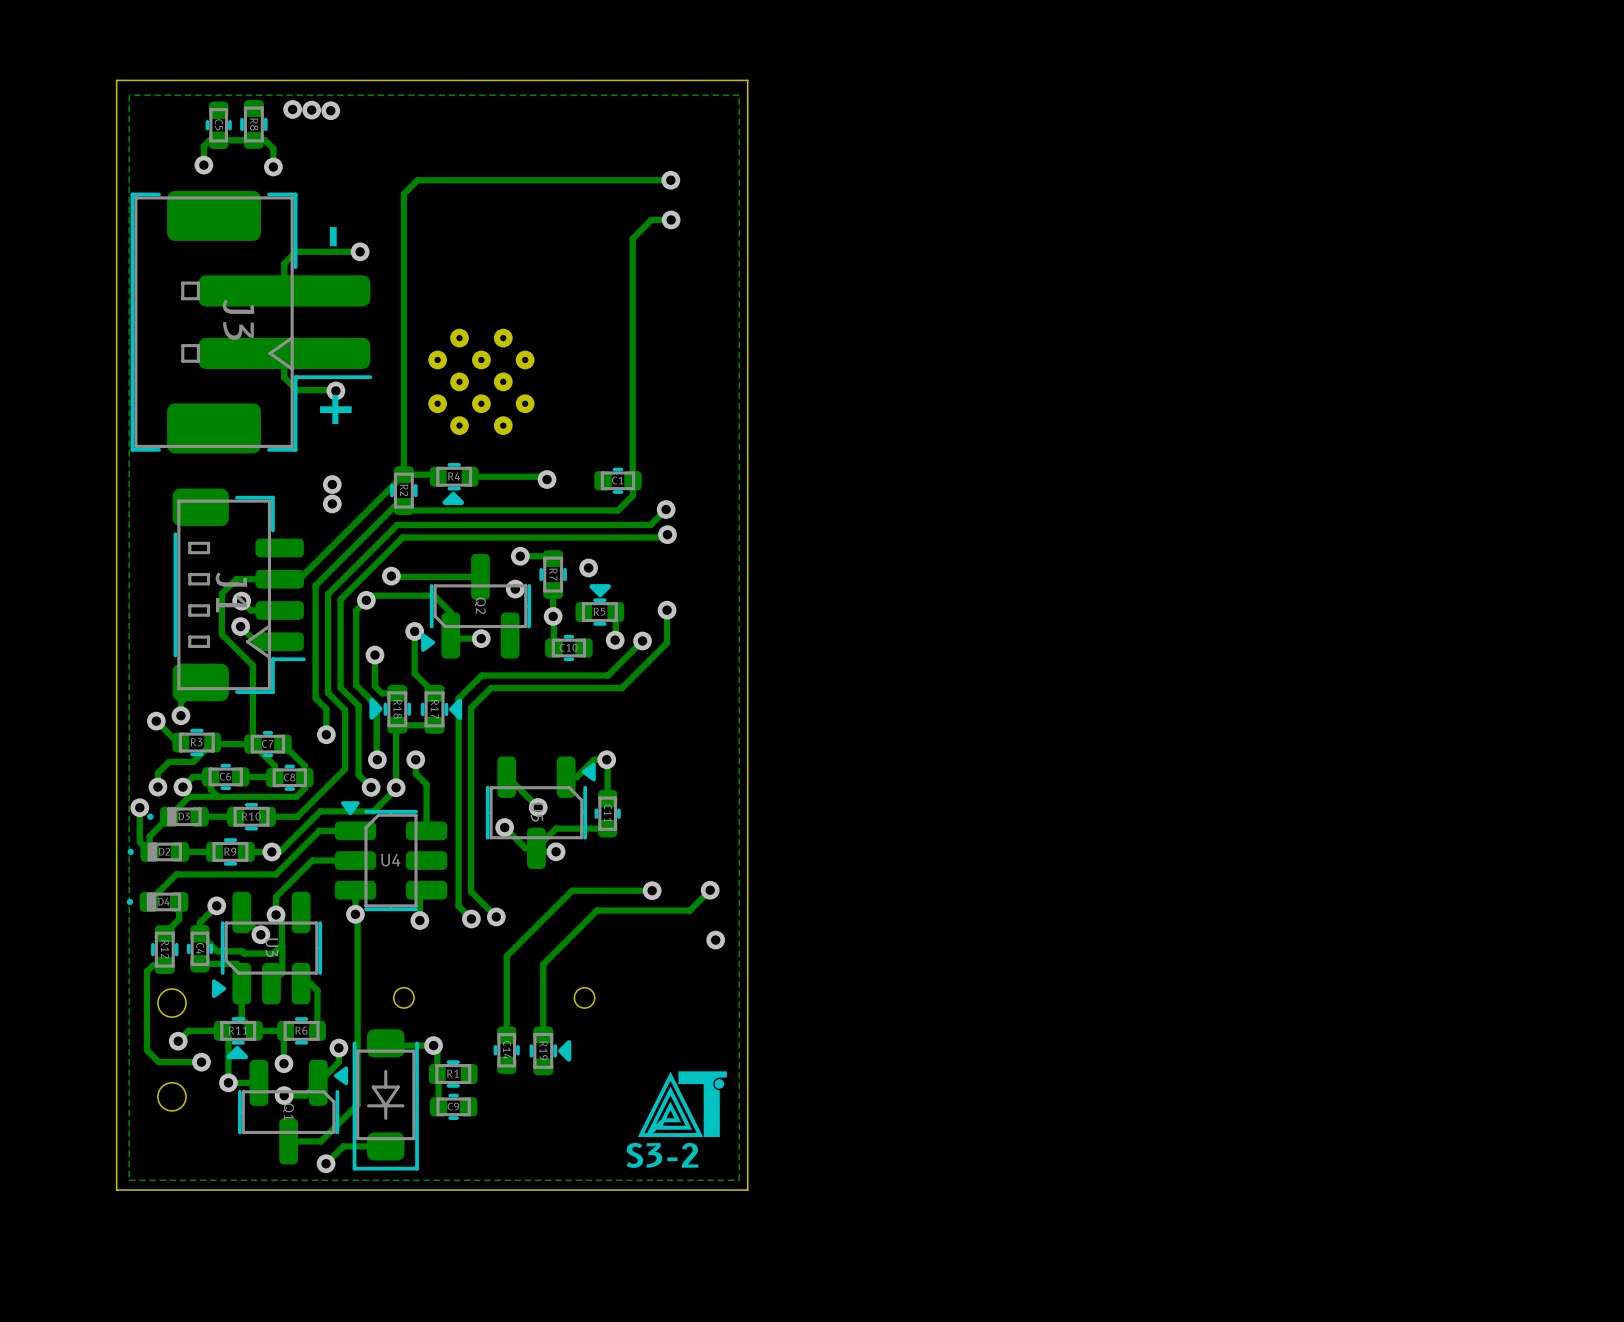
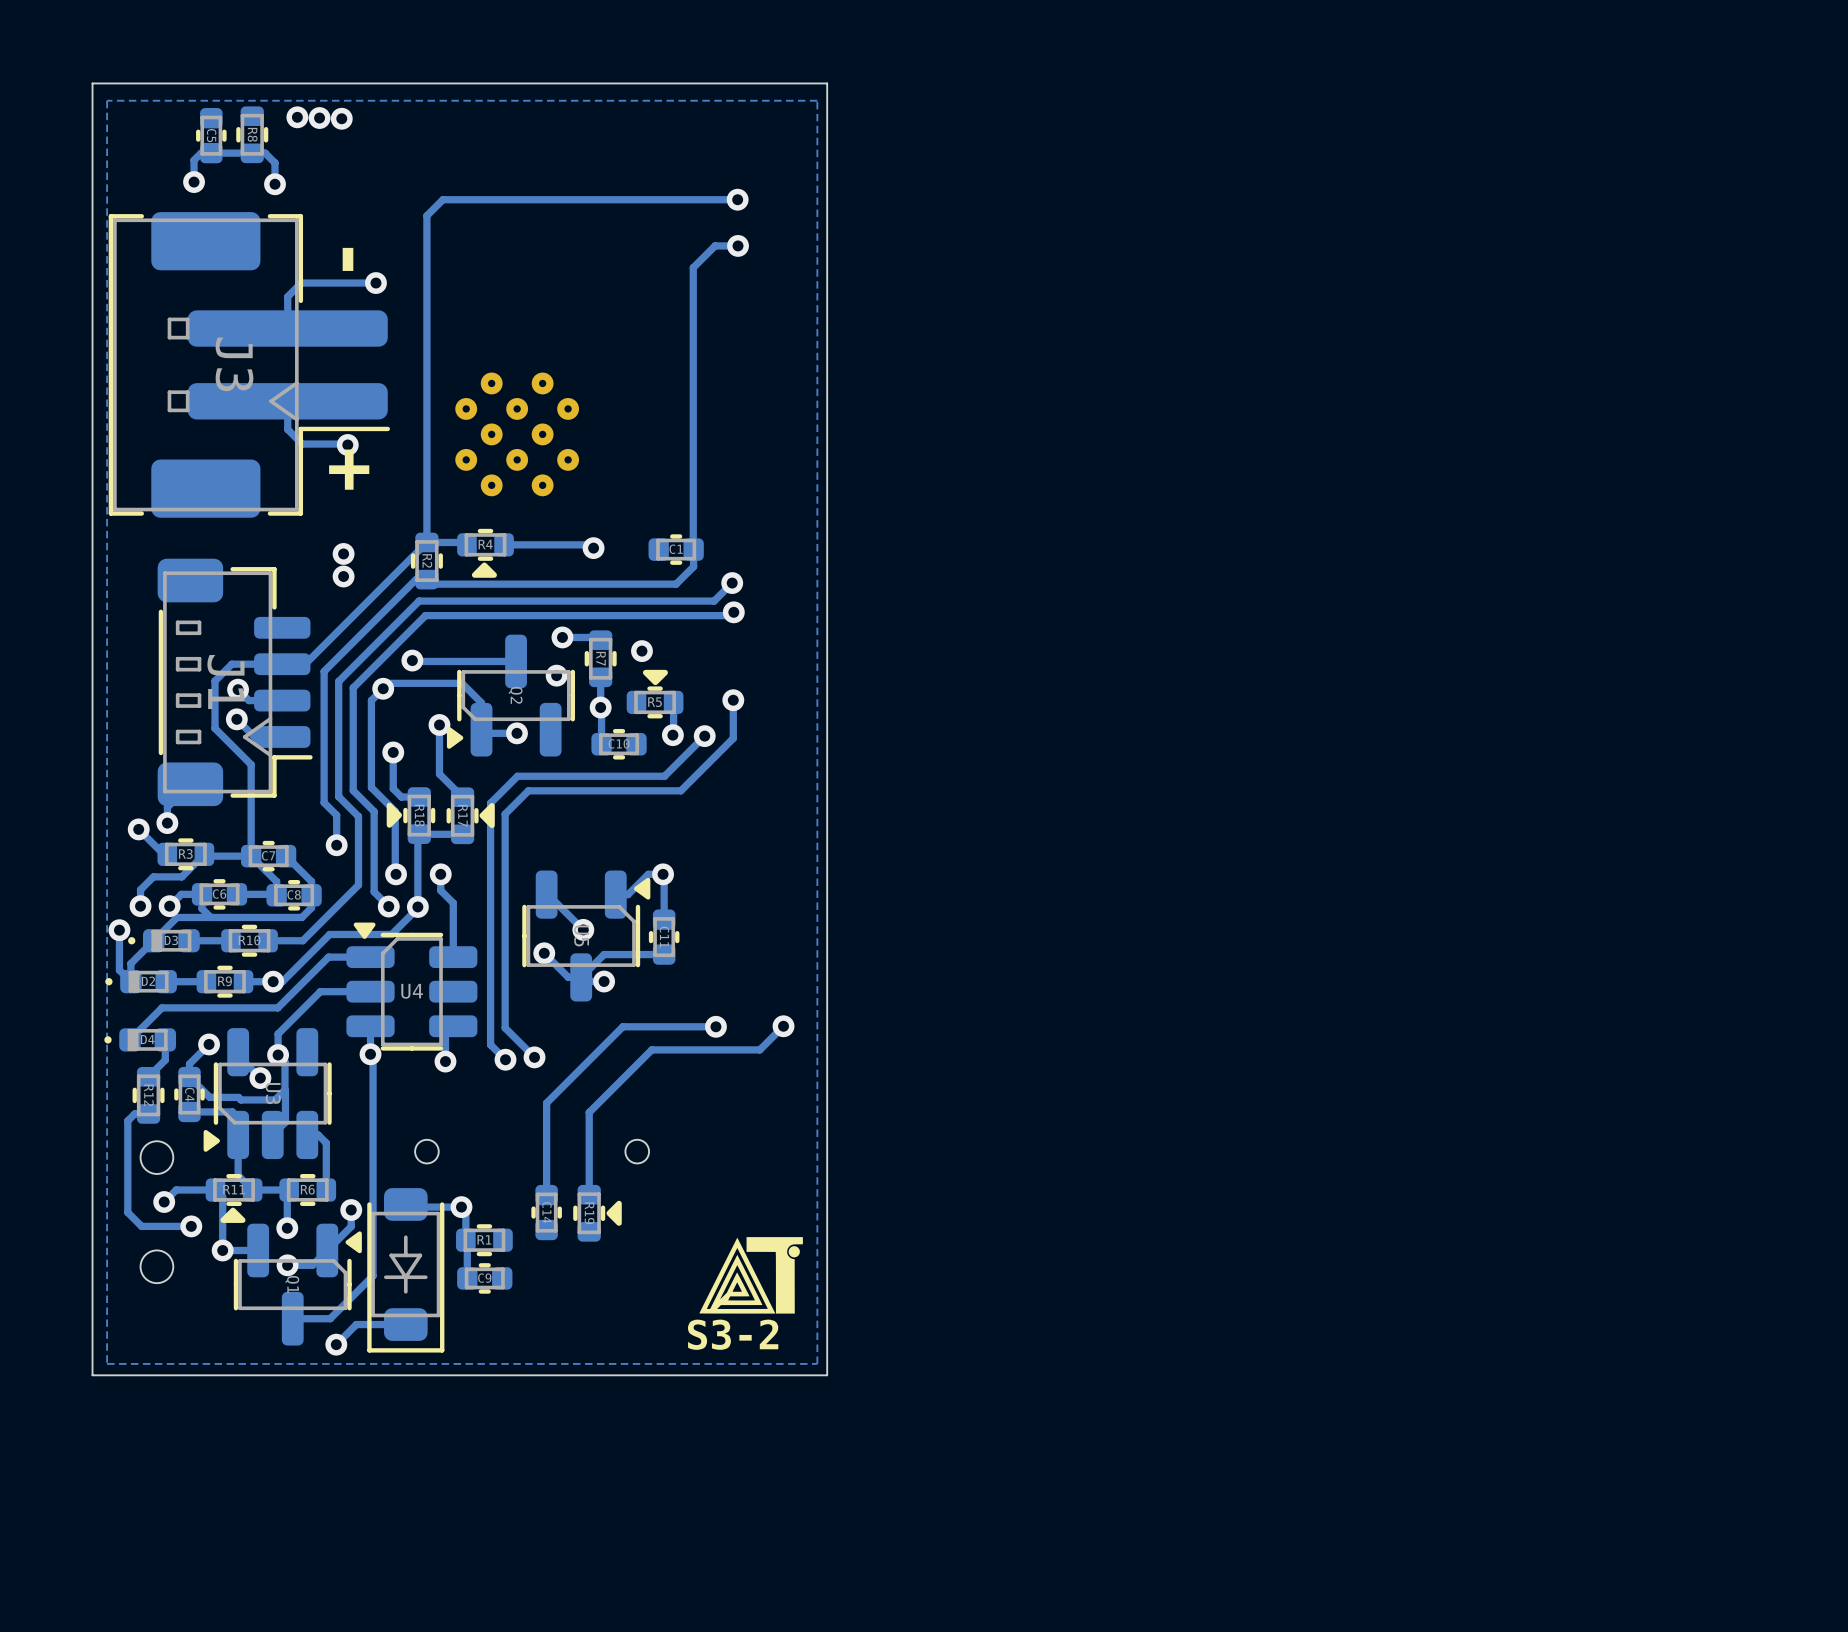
via: (715, 940) -> none

